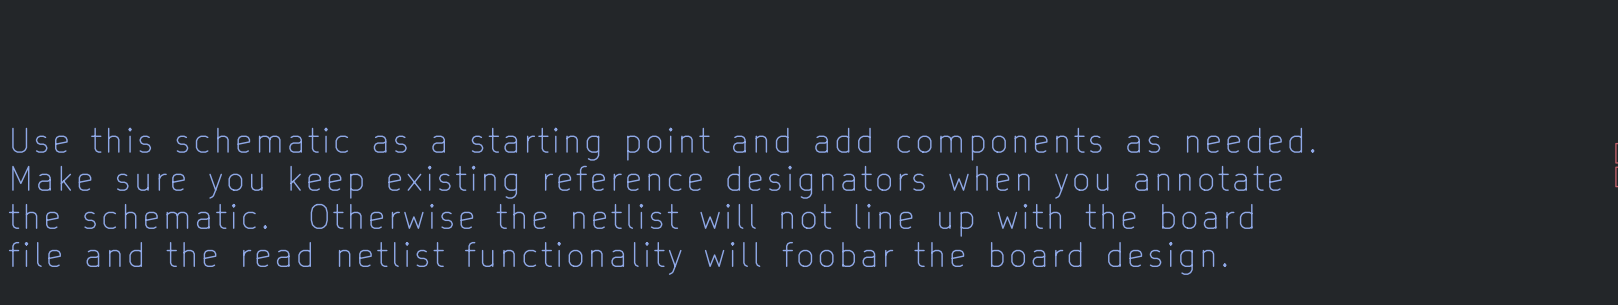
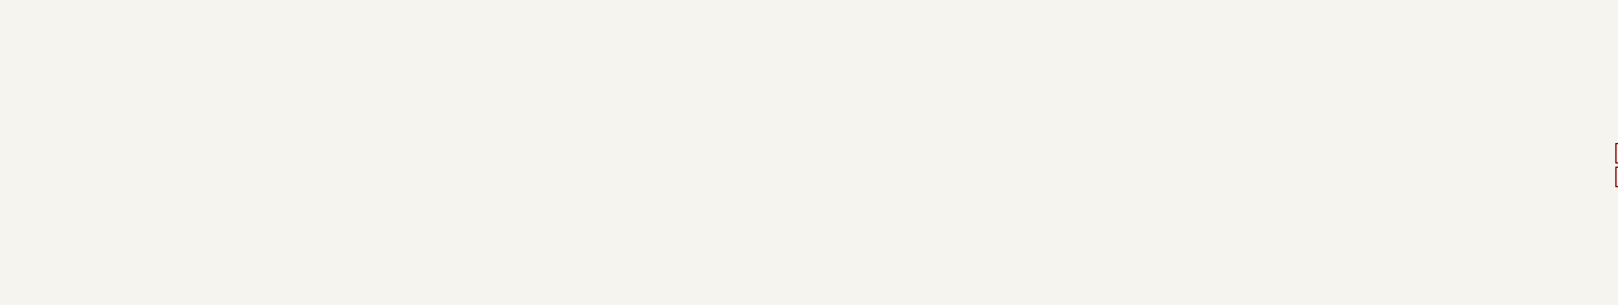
text: Use this schematic as a starting point and add components as needed. (663, 144) -> none
text: Make sure you keep existing reference designators when you annotate (647, 182) -> none
text: the schematic. Otherwise the netlist will not line up with the board (630, 220) -> none
text: file and the read netlist functionality will foobar the board design. (617, 258) -> none

